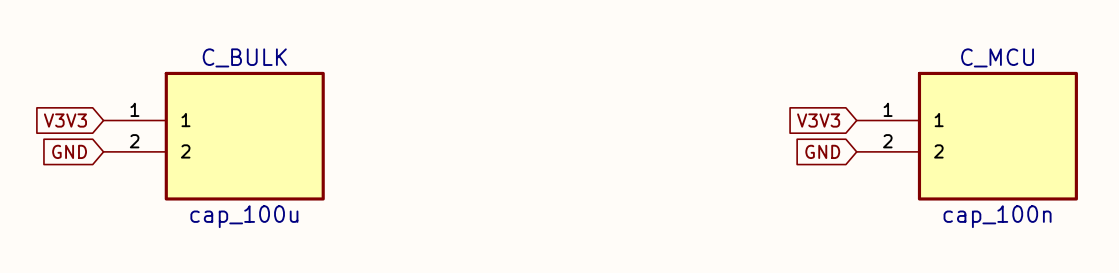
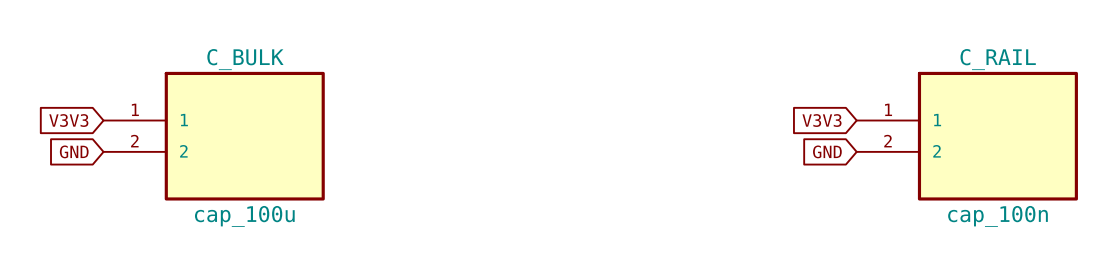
C_MCU name: C_MCU (997, 57) -> C_RAIL (998, 59)

